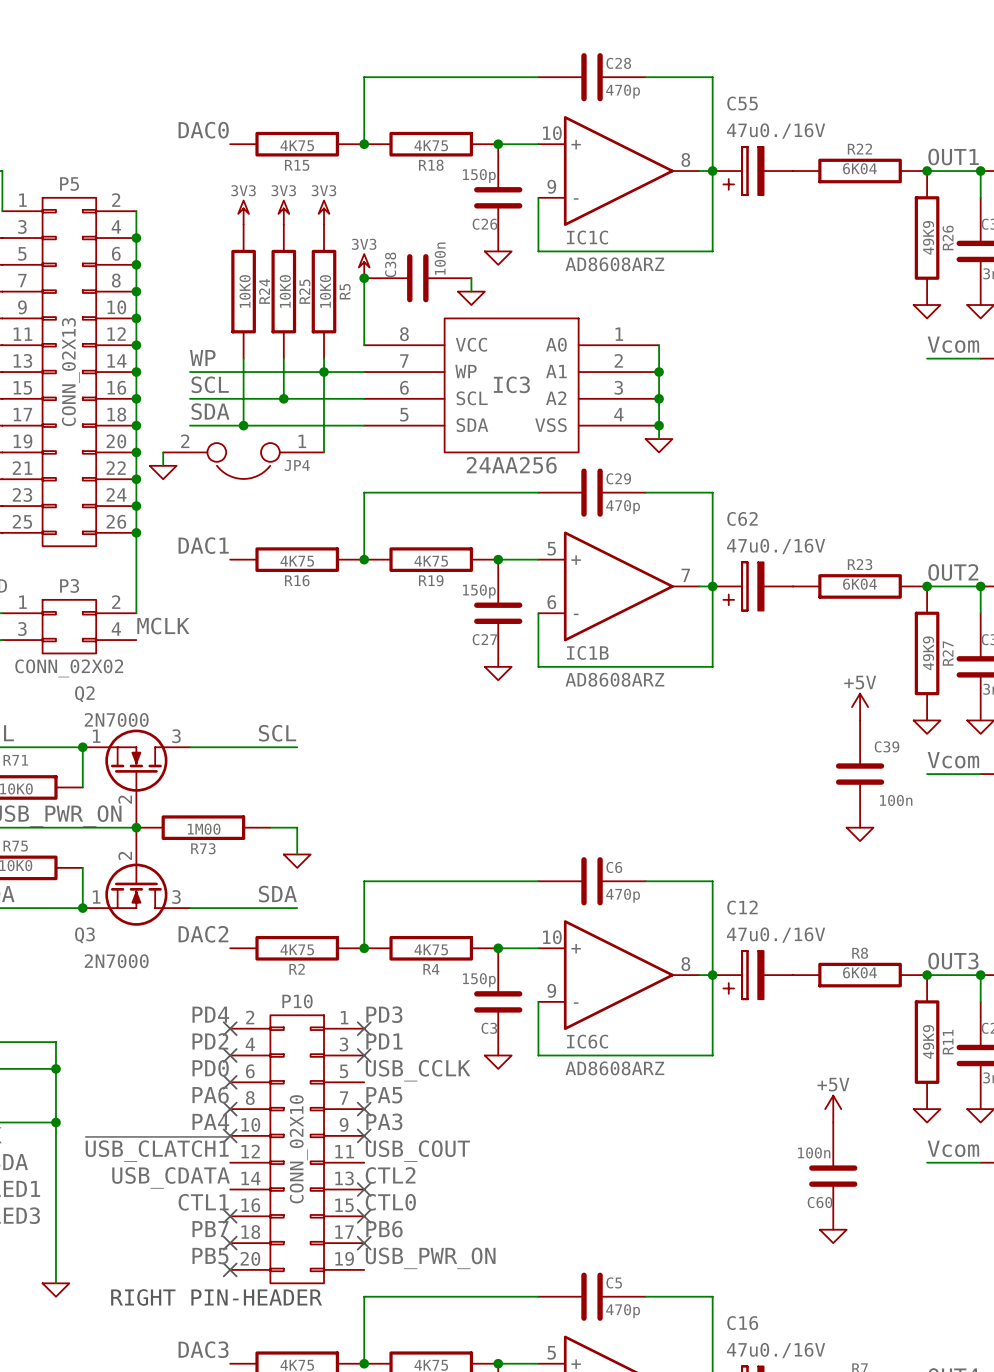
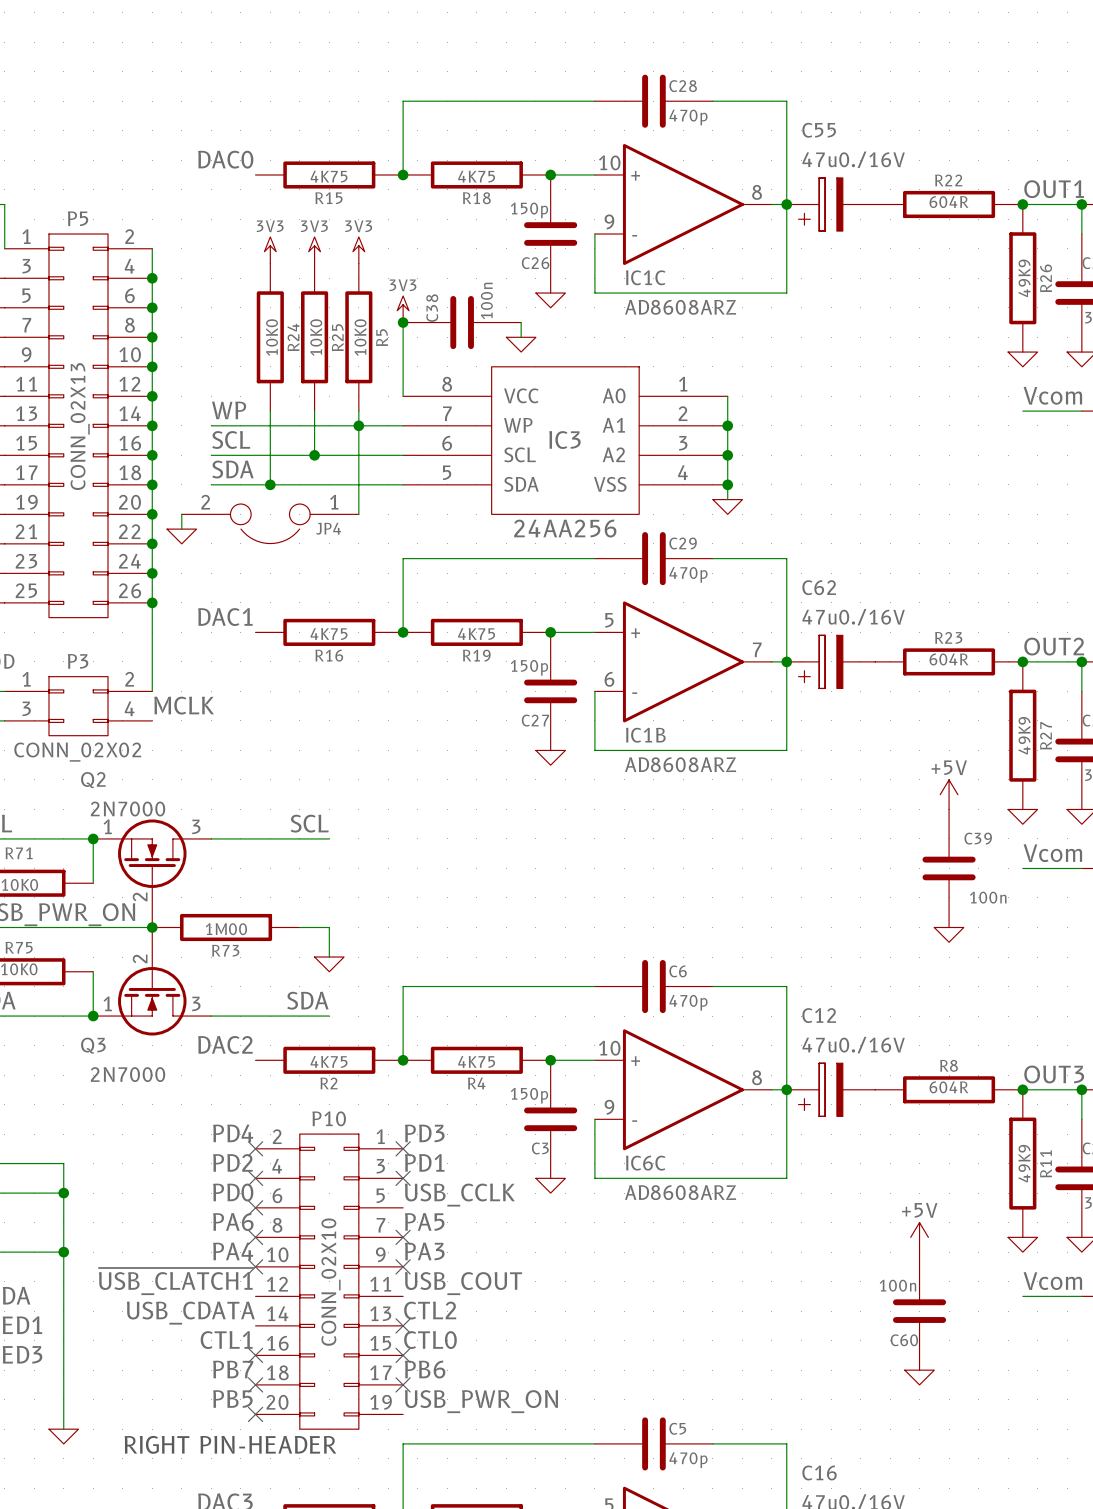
R22 value: 6K04 (859, 168) -> 604R (948, 202)
R23 value: 6K04 (859, 584) -> 604R (948, 659)
R8 value: 6K04 (859, 972) -> 604R (948, 1087)

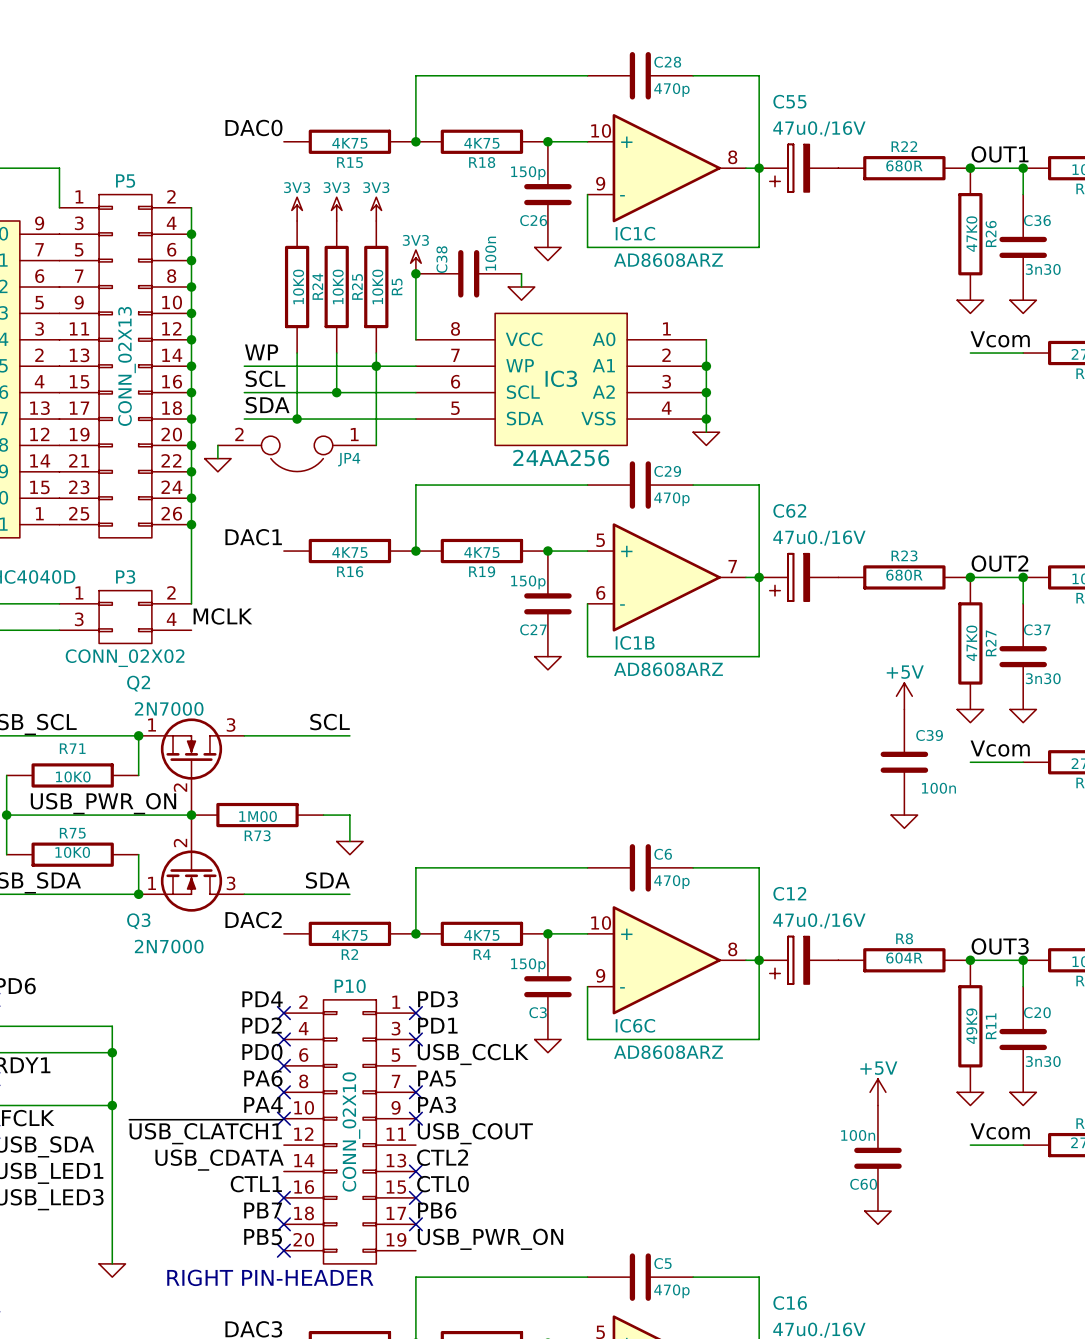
R22 value: 604R (948, 202) -> 680R (904, 165)
R26 value: 49K9 (1024, 278) -> 47K0 (971, 234)
R23 value: 604R (948, 659) -> 680R (904, 575)
R27 value: 49K9 (1024, 735) -> 47K0 (971, 643)

